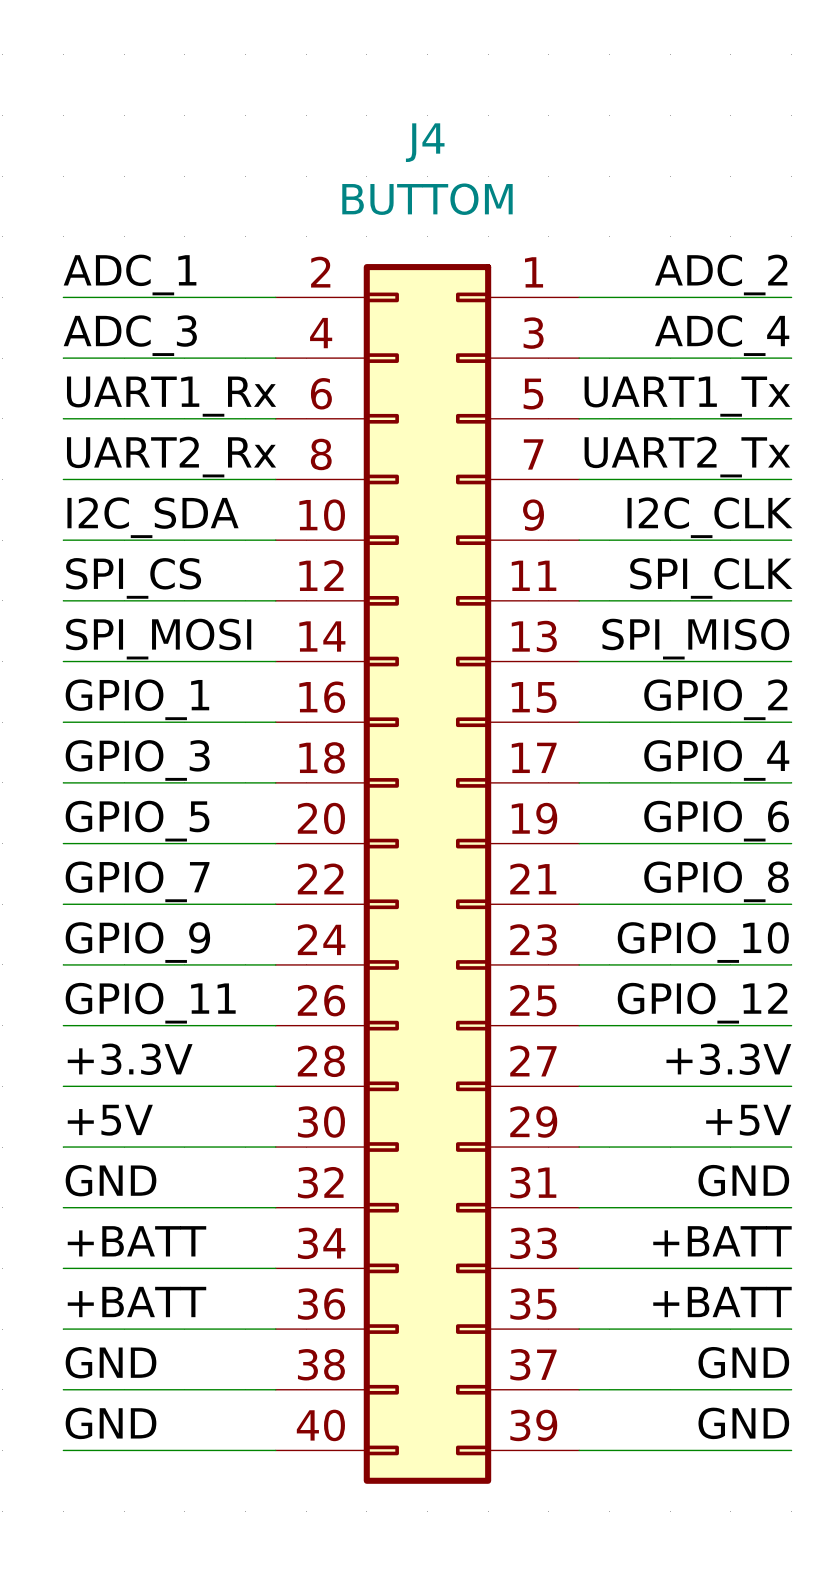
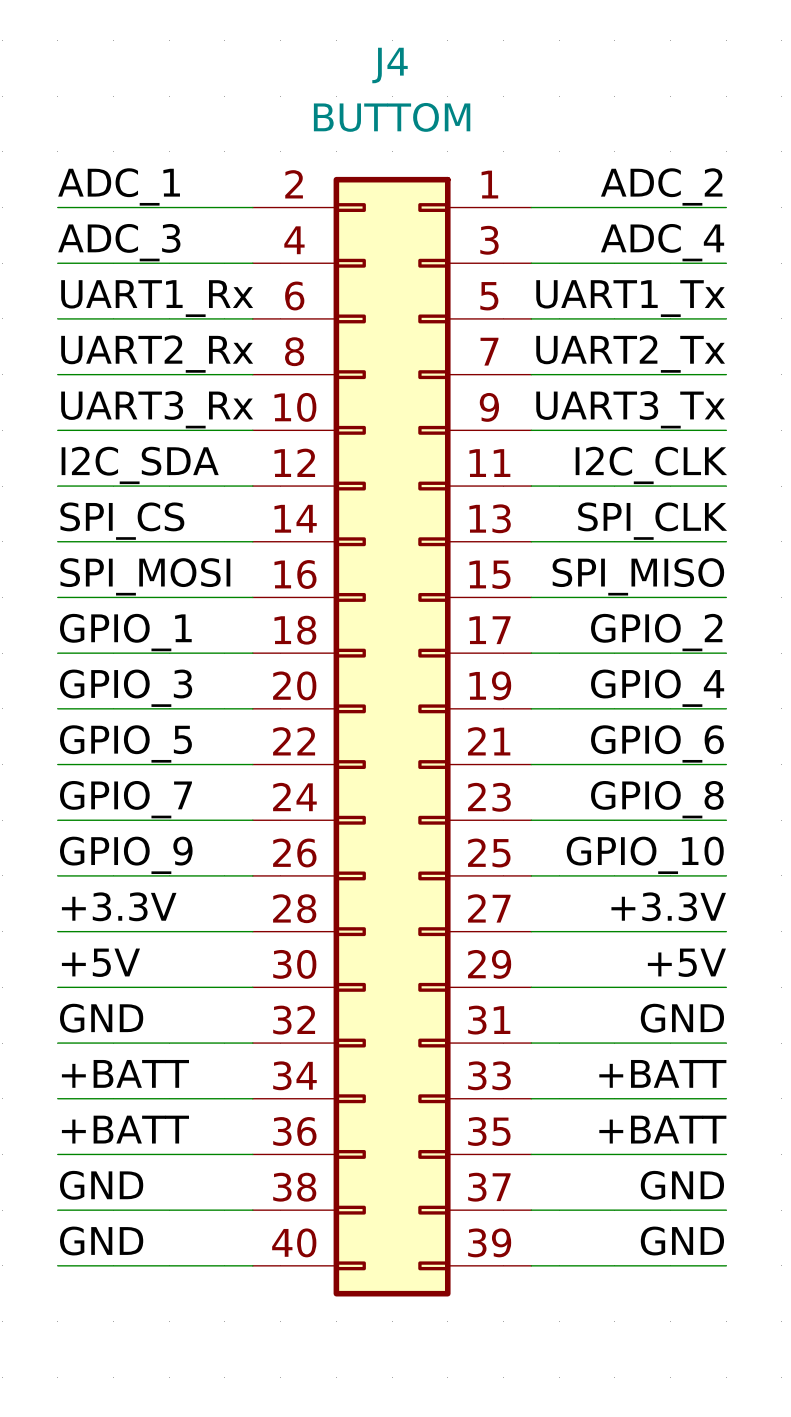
label: none -> ADC_1 (119, 186)
label: none -> ADC_2 (661, 186)
wire: none -> (57, 207) (252, 207)
wire: none -> (531, 207) (726, 207)
label: ADC_1 (130, 274) -> ADC_3 (119, 242)
label: ADC_2 (721, 274) -> ADC_4 (662, 242)
label: ADC_3 (130, 335) -> UART1_Rx (157, 298)
label: ADC_4 (722, 335) -> UART1_Tx (630, 298)
label: UART1_Rx (171, 396) -> UART2_Rx (157, 354)
label: UART1_Tx (687, 396) -> UART2_Tx (630, 354)
label: UART2_Rx (171, 457) -> UART3_Rx (157, 409)
label: UART2_Tx (687, 457) -> UART3_Tx (630, 409)
J4 position: (427, 873) -> (392, 736)
label: GPIO_11 (150, 1003) -> +3.3V (119, 906)
label: GPIO_12 (702, 1003) -> +3.3V (668, 906)
label: +3.3V (130, 1059) -> +5V (100, 962)
label: +3.3V (728, 1059) -> +5V (686, 962)
label: +5V (110, 1120) -> GND (101, 1018)
label: +5V (748, 1120) -> GND (682, 1018)
label: GND (111, 1180) -> +BATT (125, 1073)
label: GND (743, 1180) -> +BATT (662, 1073)
label: +BATT (136, 1301) -> GND (101, 1185)
label: +BATT (722, 1301) -> GND (682, 1185)
label: GND (111, 1423) -> none
label: GND (743, 1423) -> none
wire: (63, 1450) (275, 1450) -> none
wire: (579, 1450) (791, 1450) -> none

